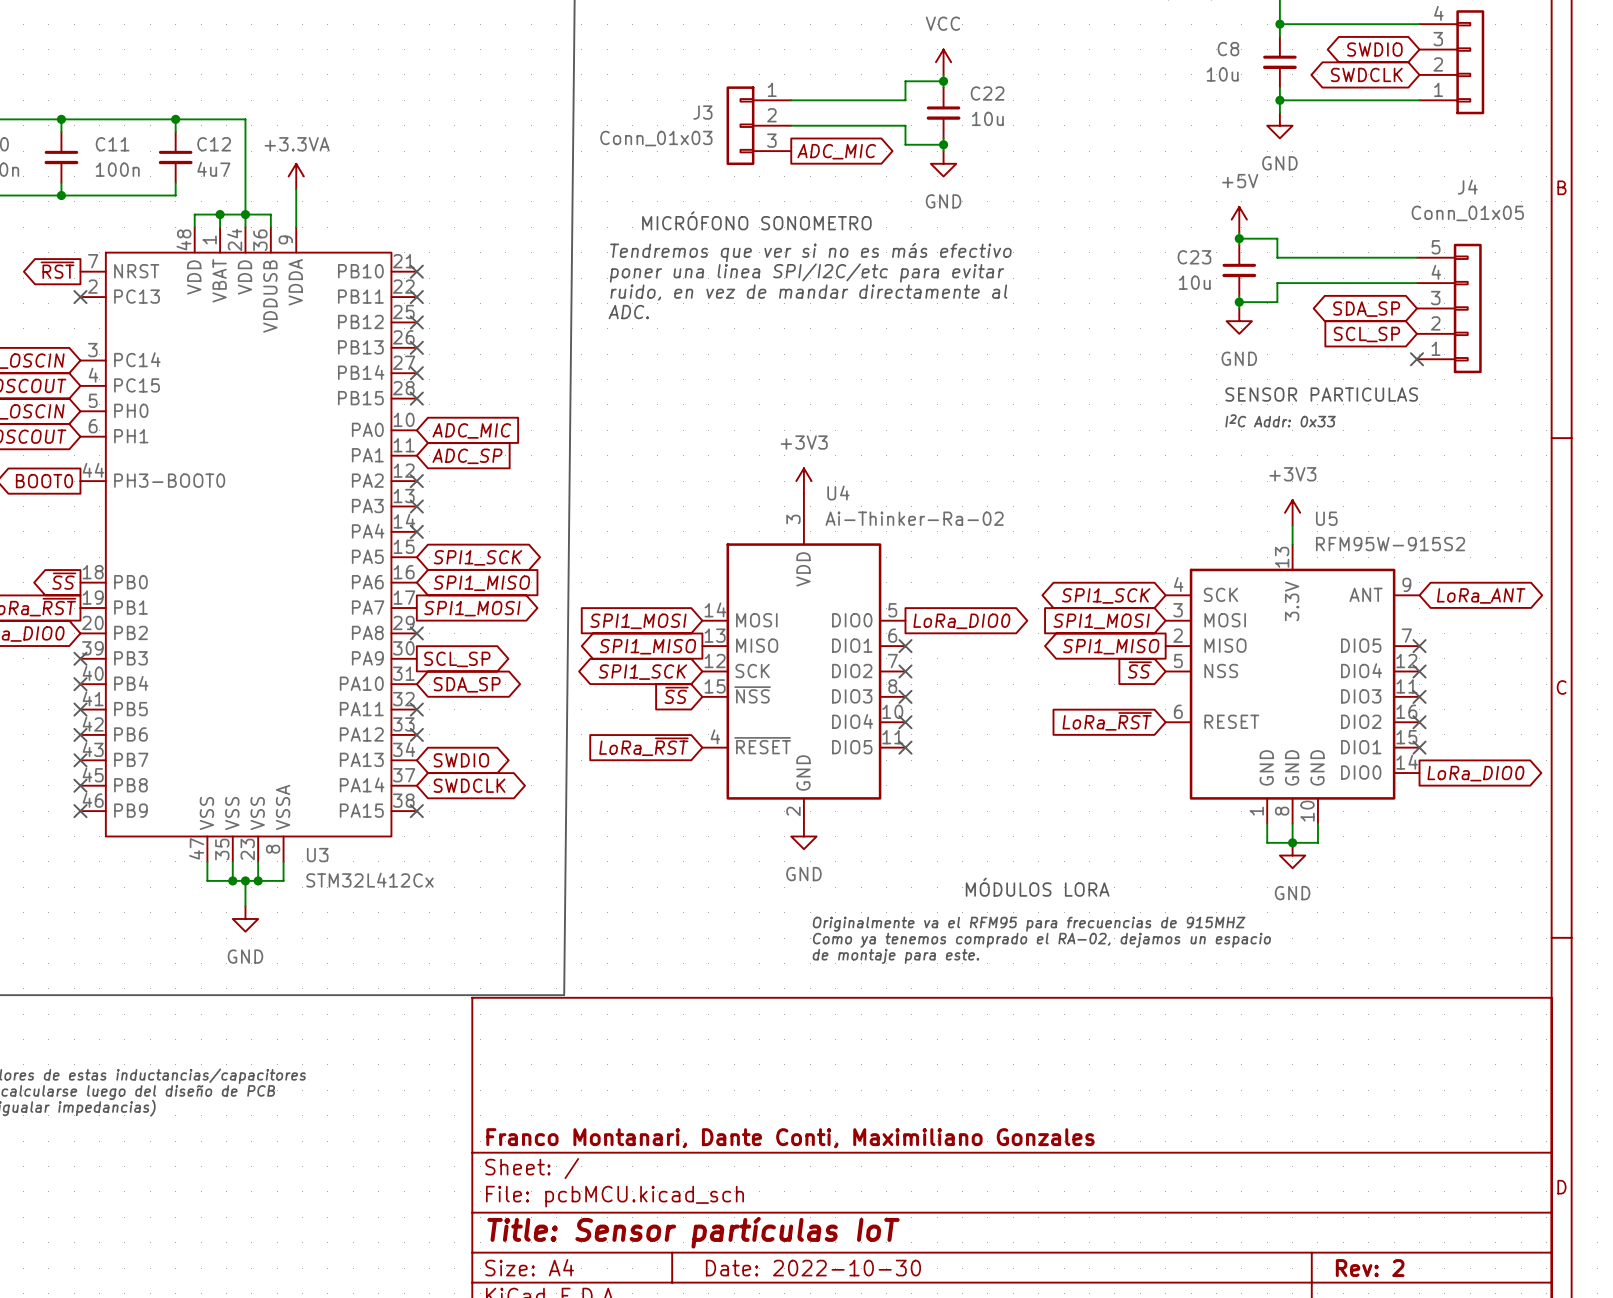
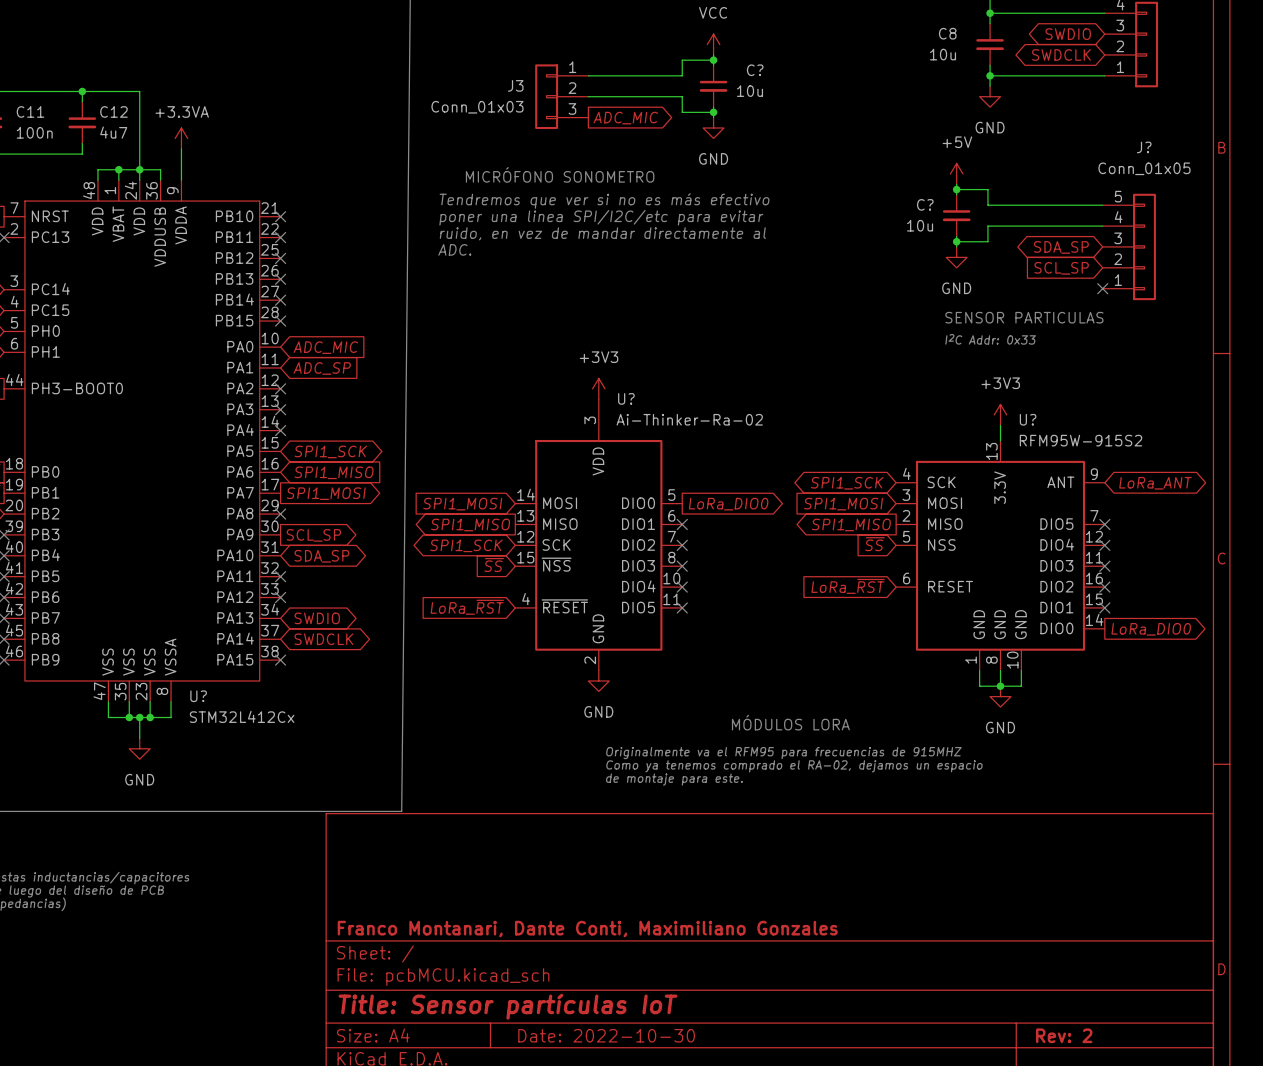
C22 name: C22 (987, 93) -> C? (755, 70)
J4 name: J4 (1467, 187) -> J? (1144, 147)
C23 name: C23 (1194, 257) -> C? (925, 204)
U4 name: U4 (838, 493) -> U? (626, 398)
U5 name: U5 (1326, 518) -> U? (1028, 419)
U3 name: U3 (317, 855) -> U? (198, 696)

